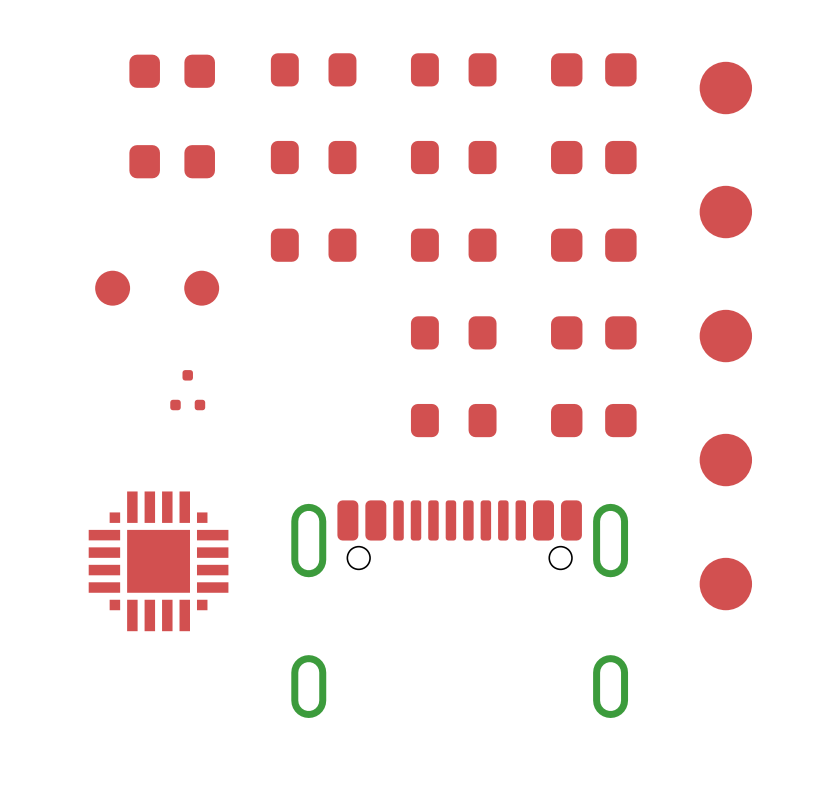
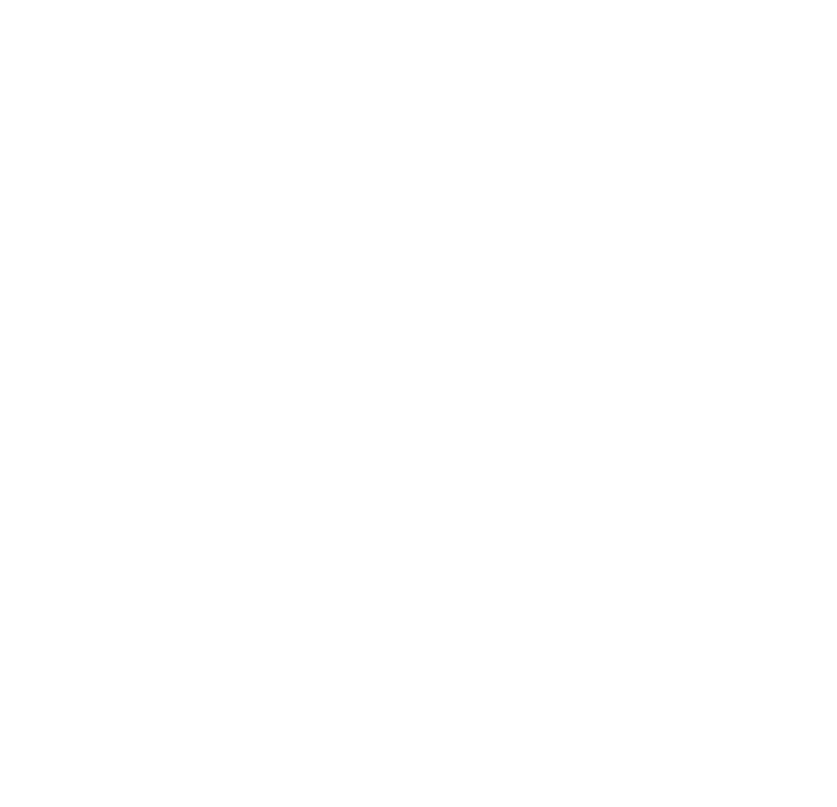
part: (313, 69) -> none
part: (453, 69) -> none
part: (593, 69) -> none
part: (172, 71) -> none
part: (725, 88) -> none
part: (313, 157) -> none
part: (453, 157) -> none
part: (593, 157) -> none
part: (172, 161) -> none
part: (725, 212) -> none
part: (313, 245) -> none
part: (453, 245) -> none
part: (593, 245) -> none
part: (157, 288) -> none
part: (453, 332) -> none
part: (593, 332) -> none
part: (725, 336) -> none
part: (187, 390) -> none
part: (453, 420) -> none
part: (593, 420) -> none
part: (725, 460) -> none
part: (158, 561) -> none
part: (725, 584) -> none
part: (459, 609) -> none

